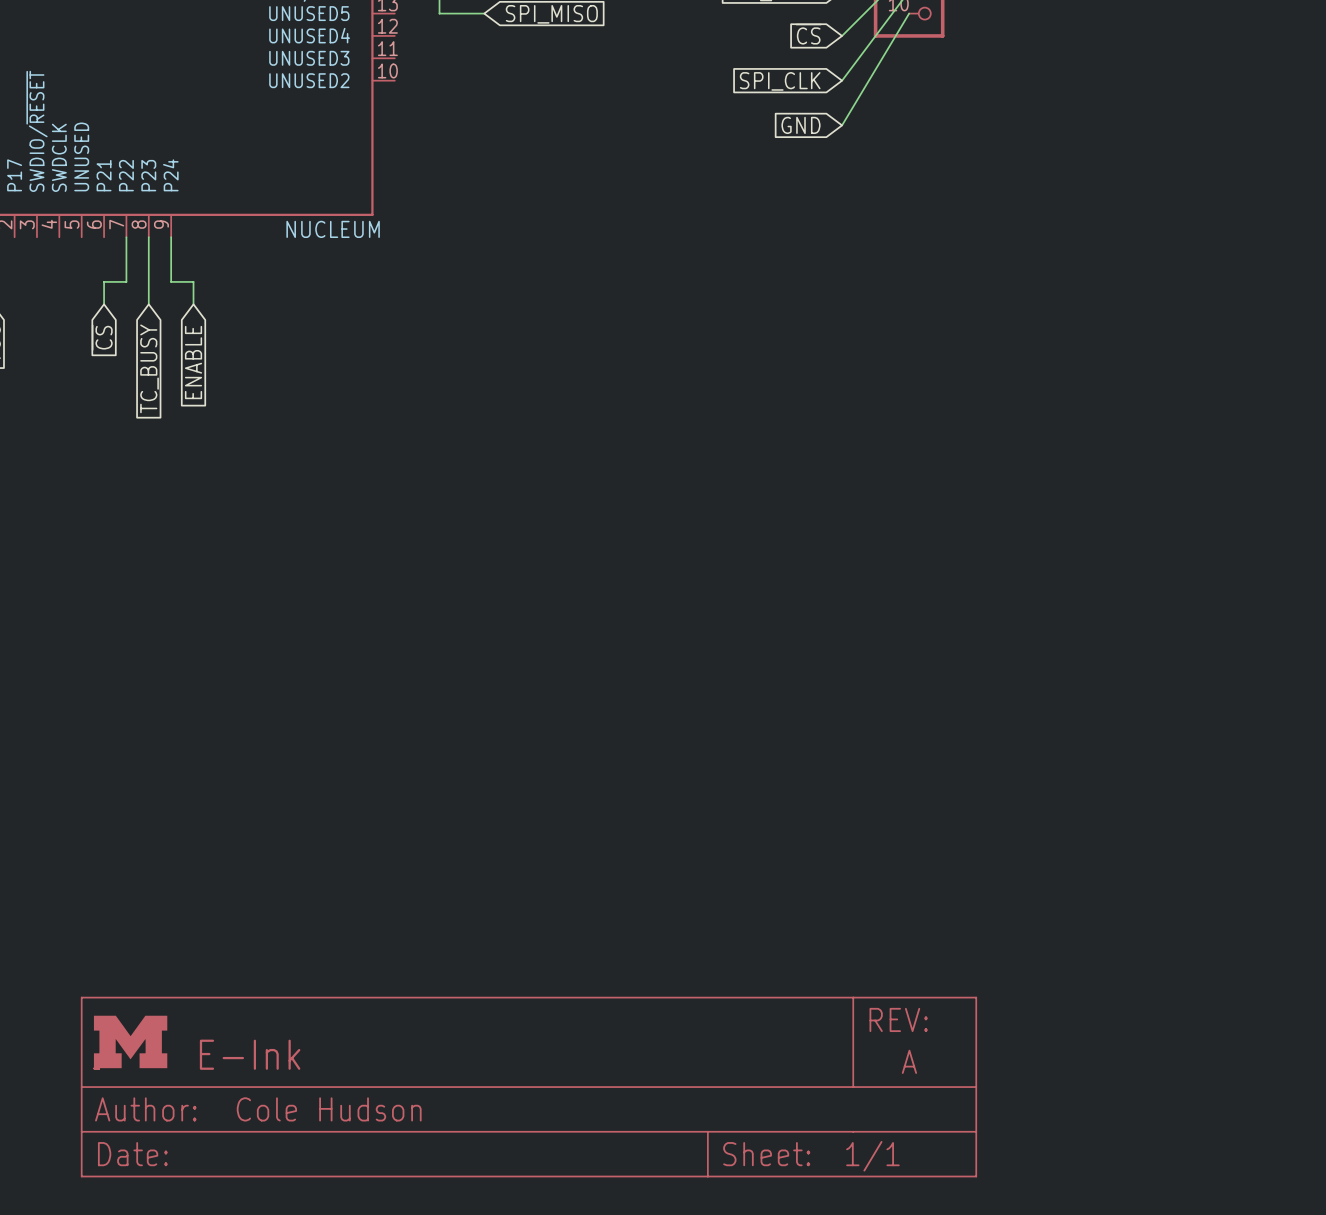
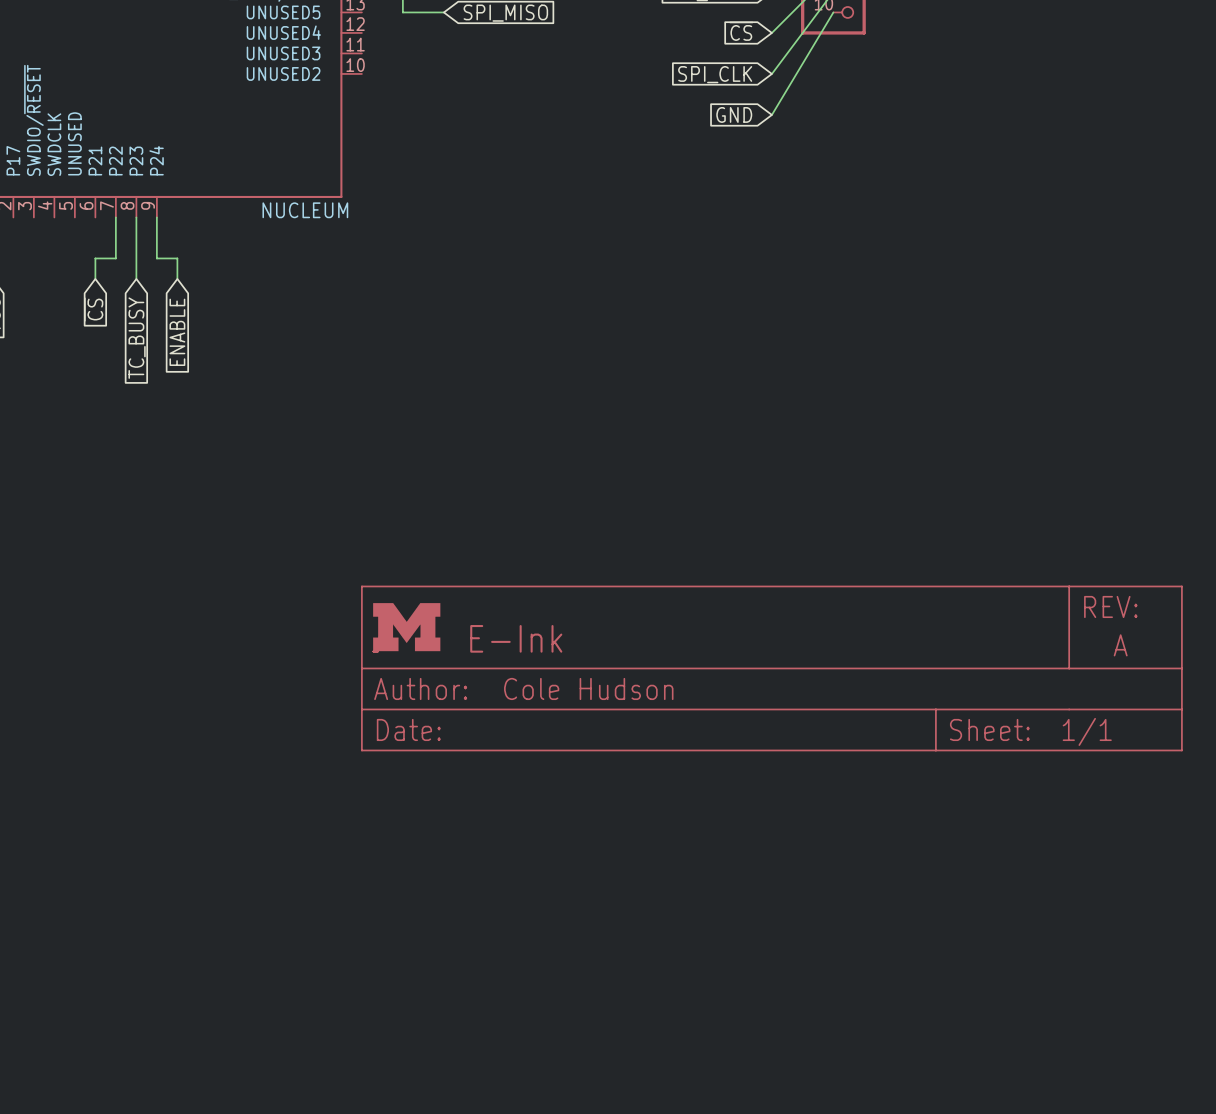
part: none -> (771, 668)
part: (528, 1087) -> none

